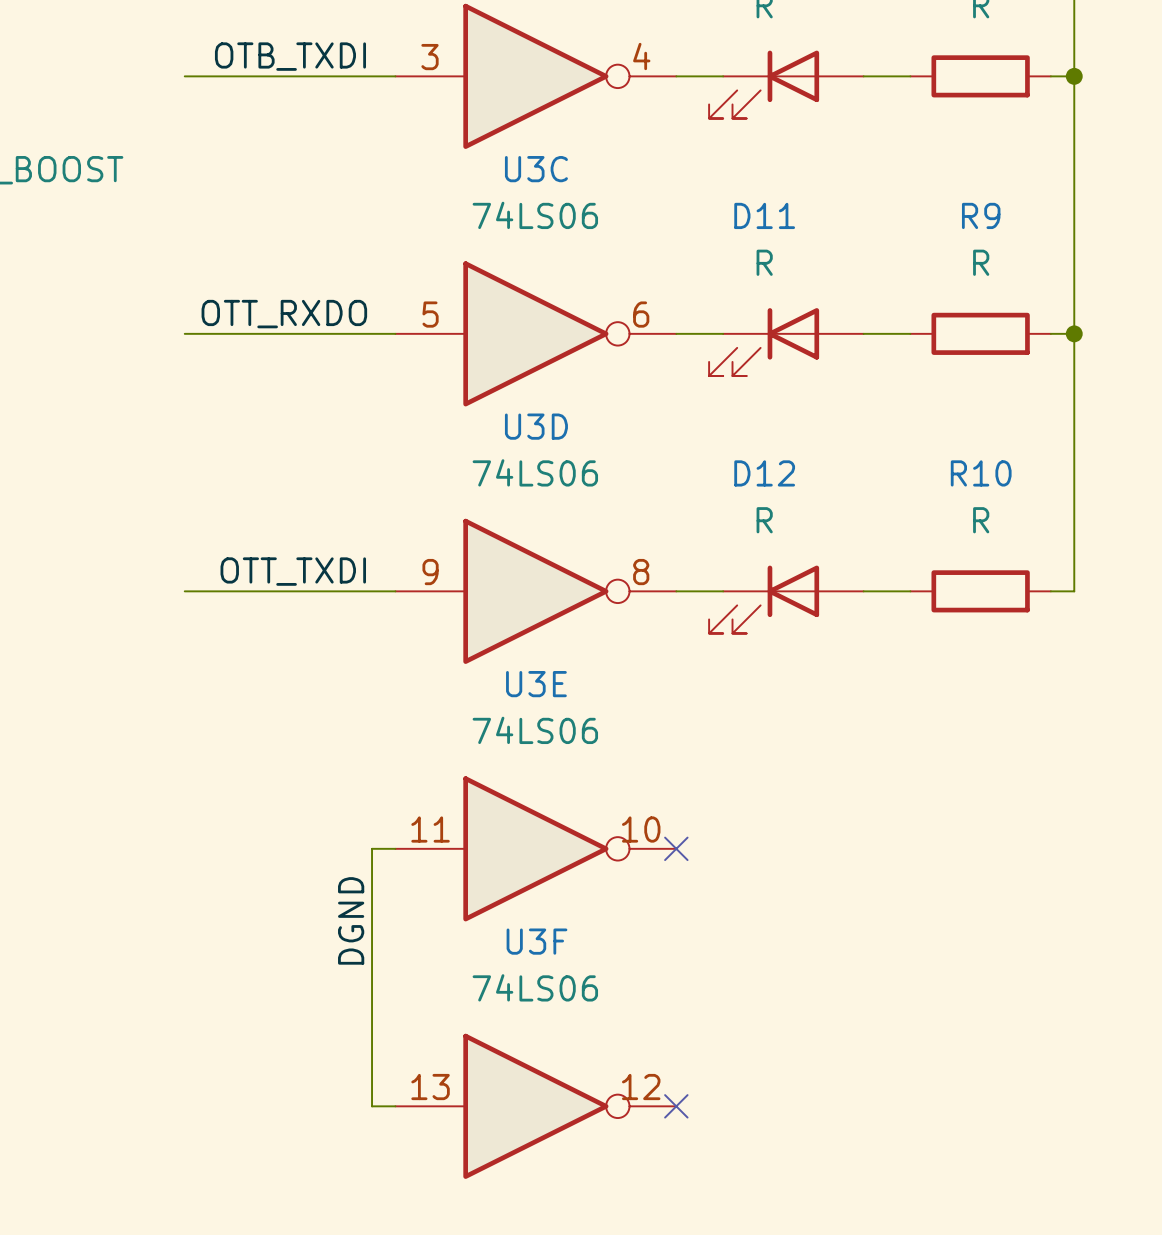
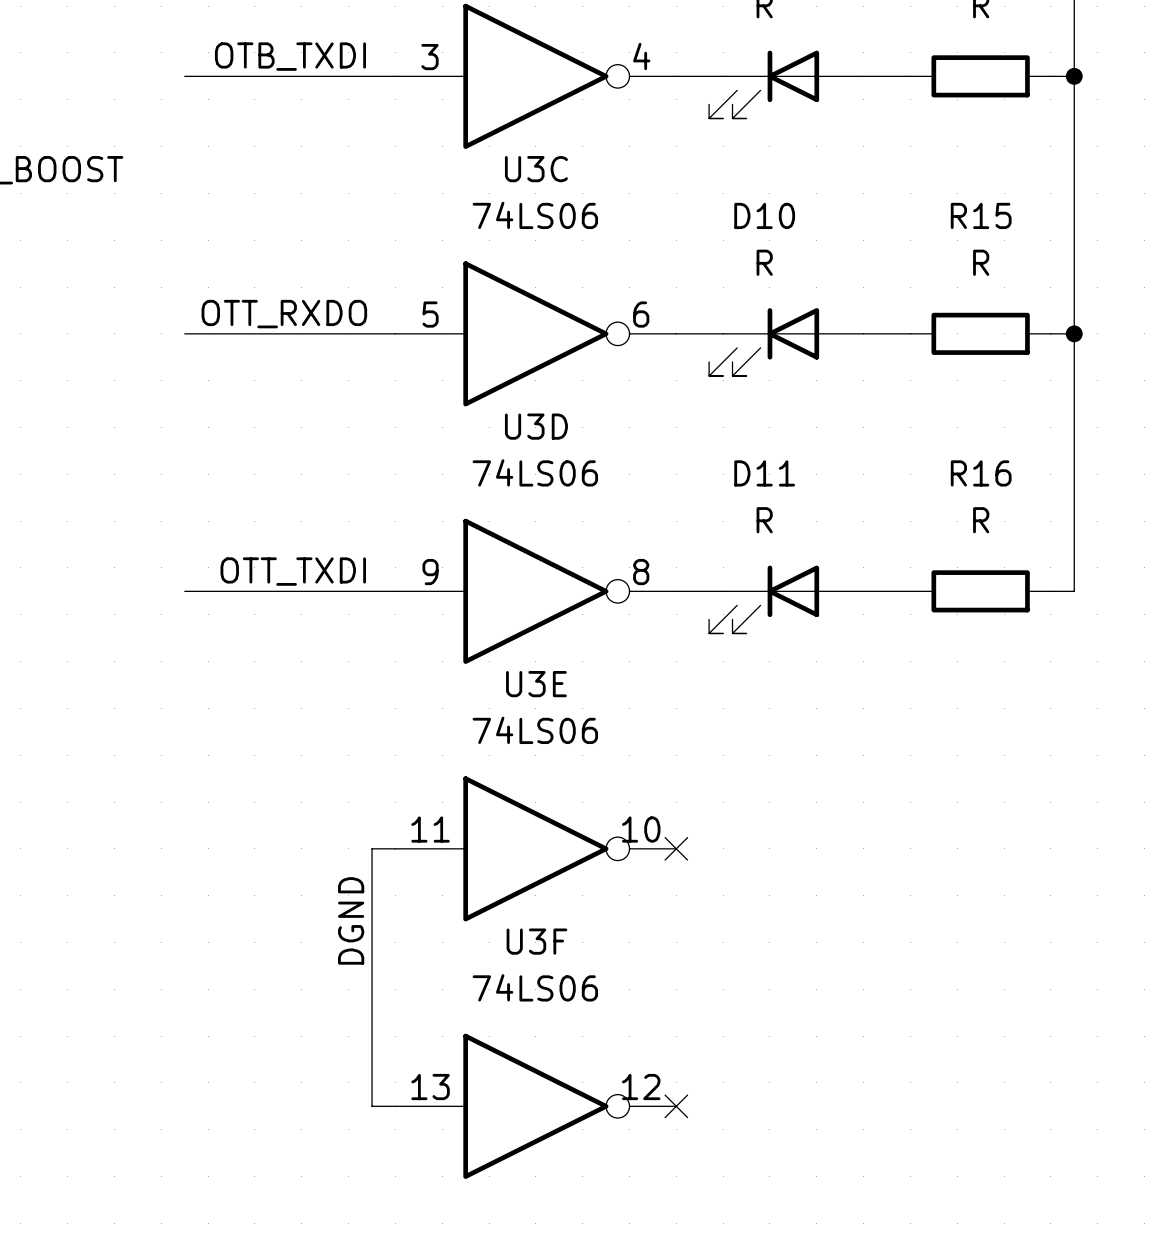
D11 name: D11 (764, 215) -> D10 (764, 215)
R9 name: R9 (981, 215) -> R15 (981, 215)
D12 name: D12 (764, 473) -> D11 (764, 473)
R10 name: R10 (981, 473) -> R16 (981, 473)

